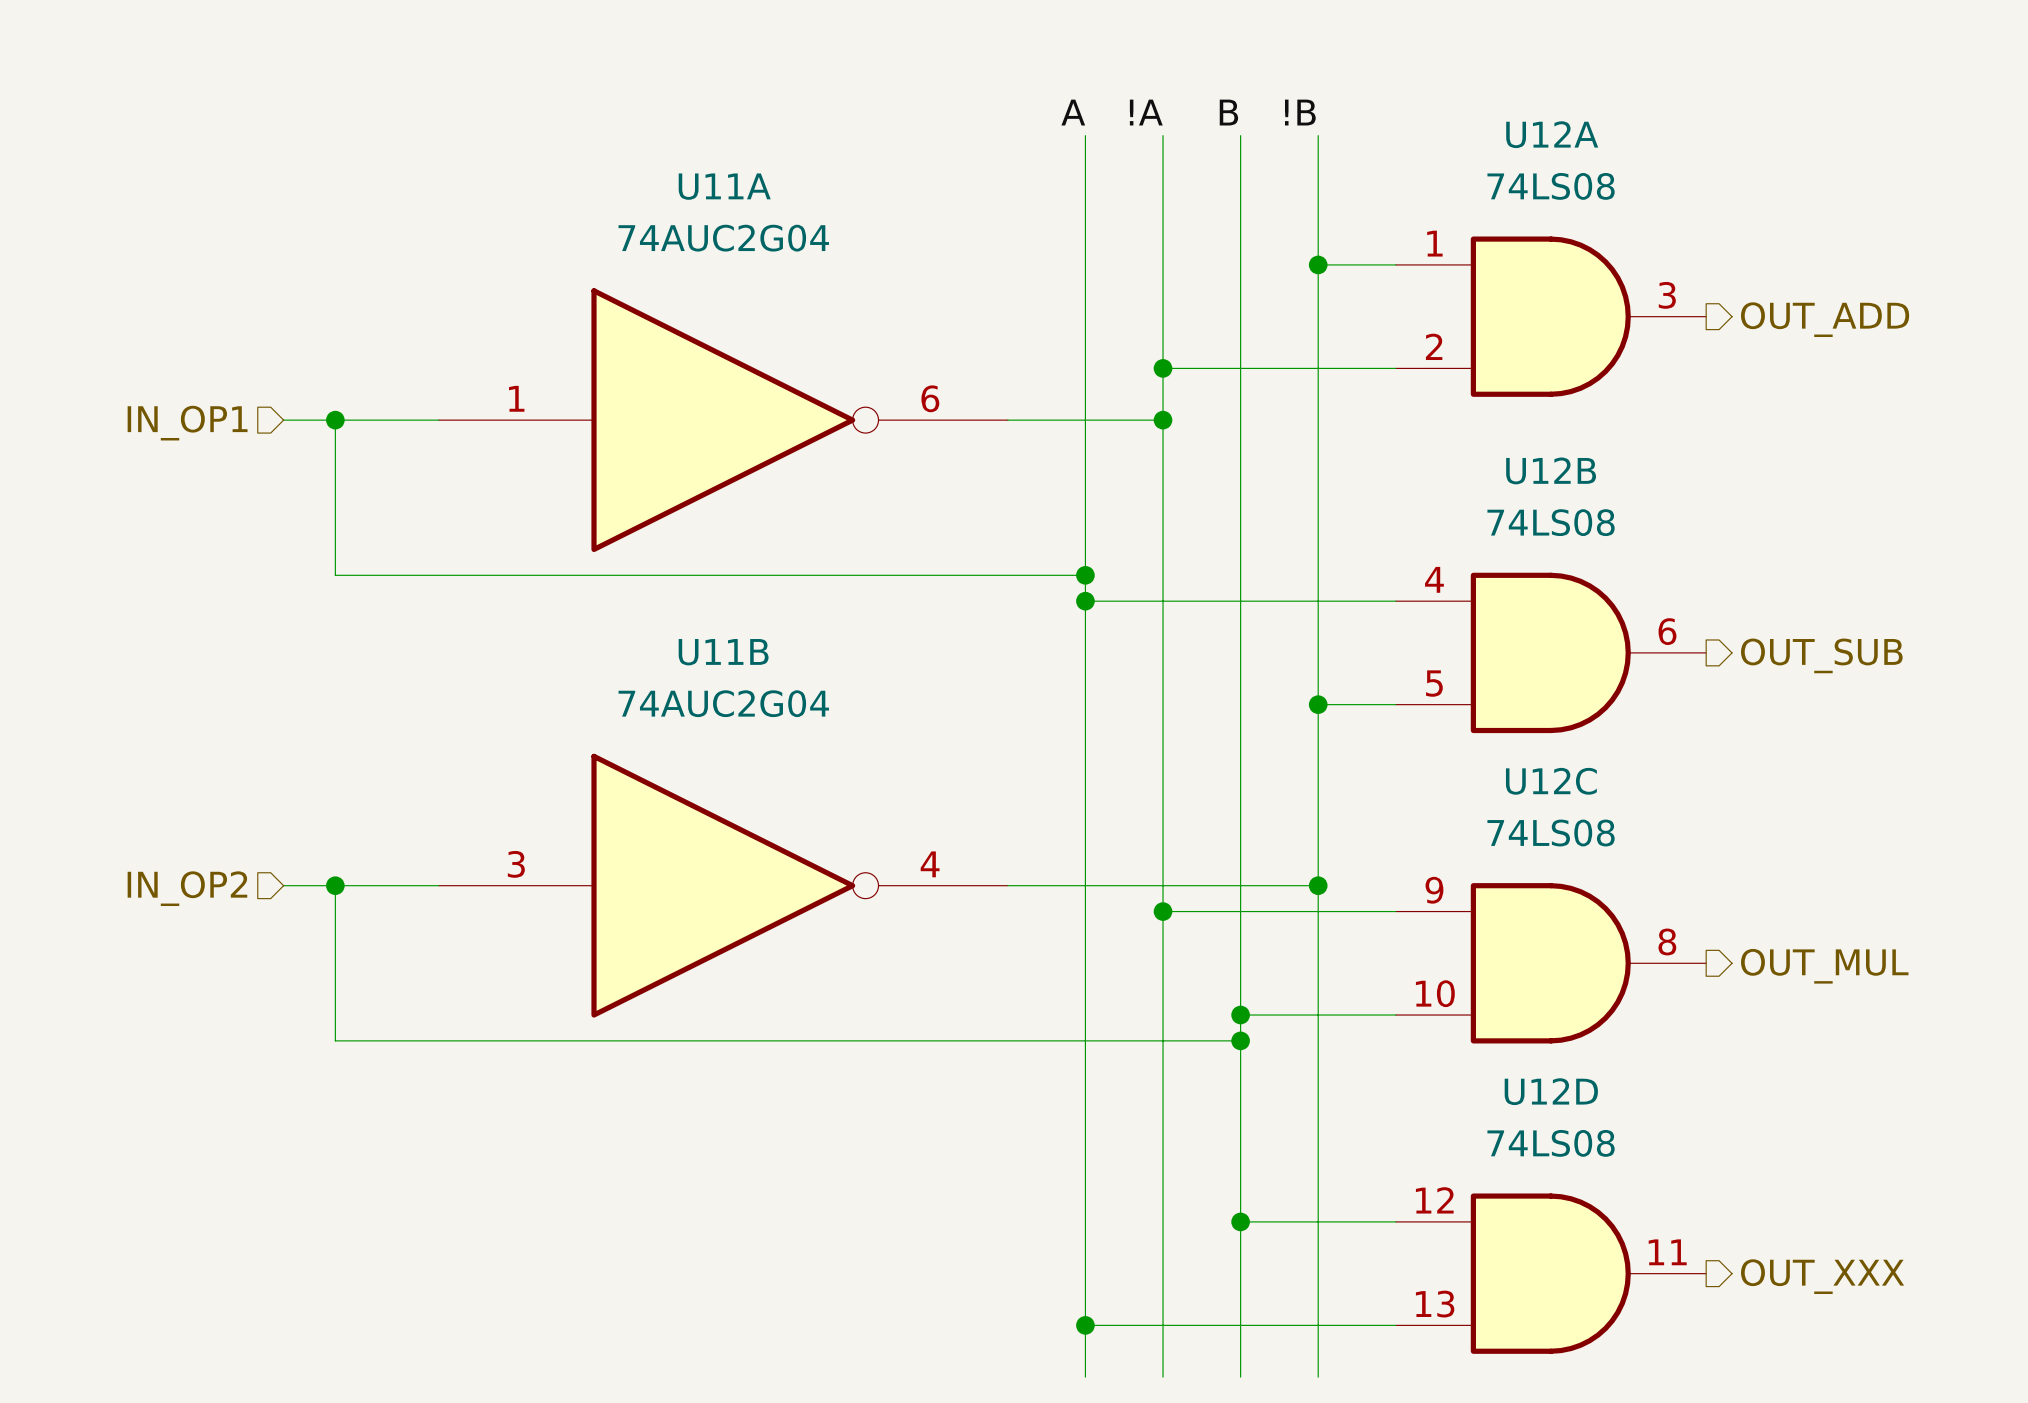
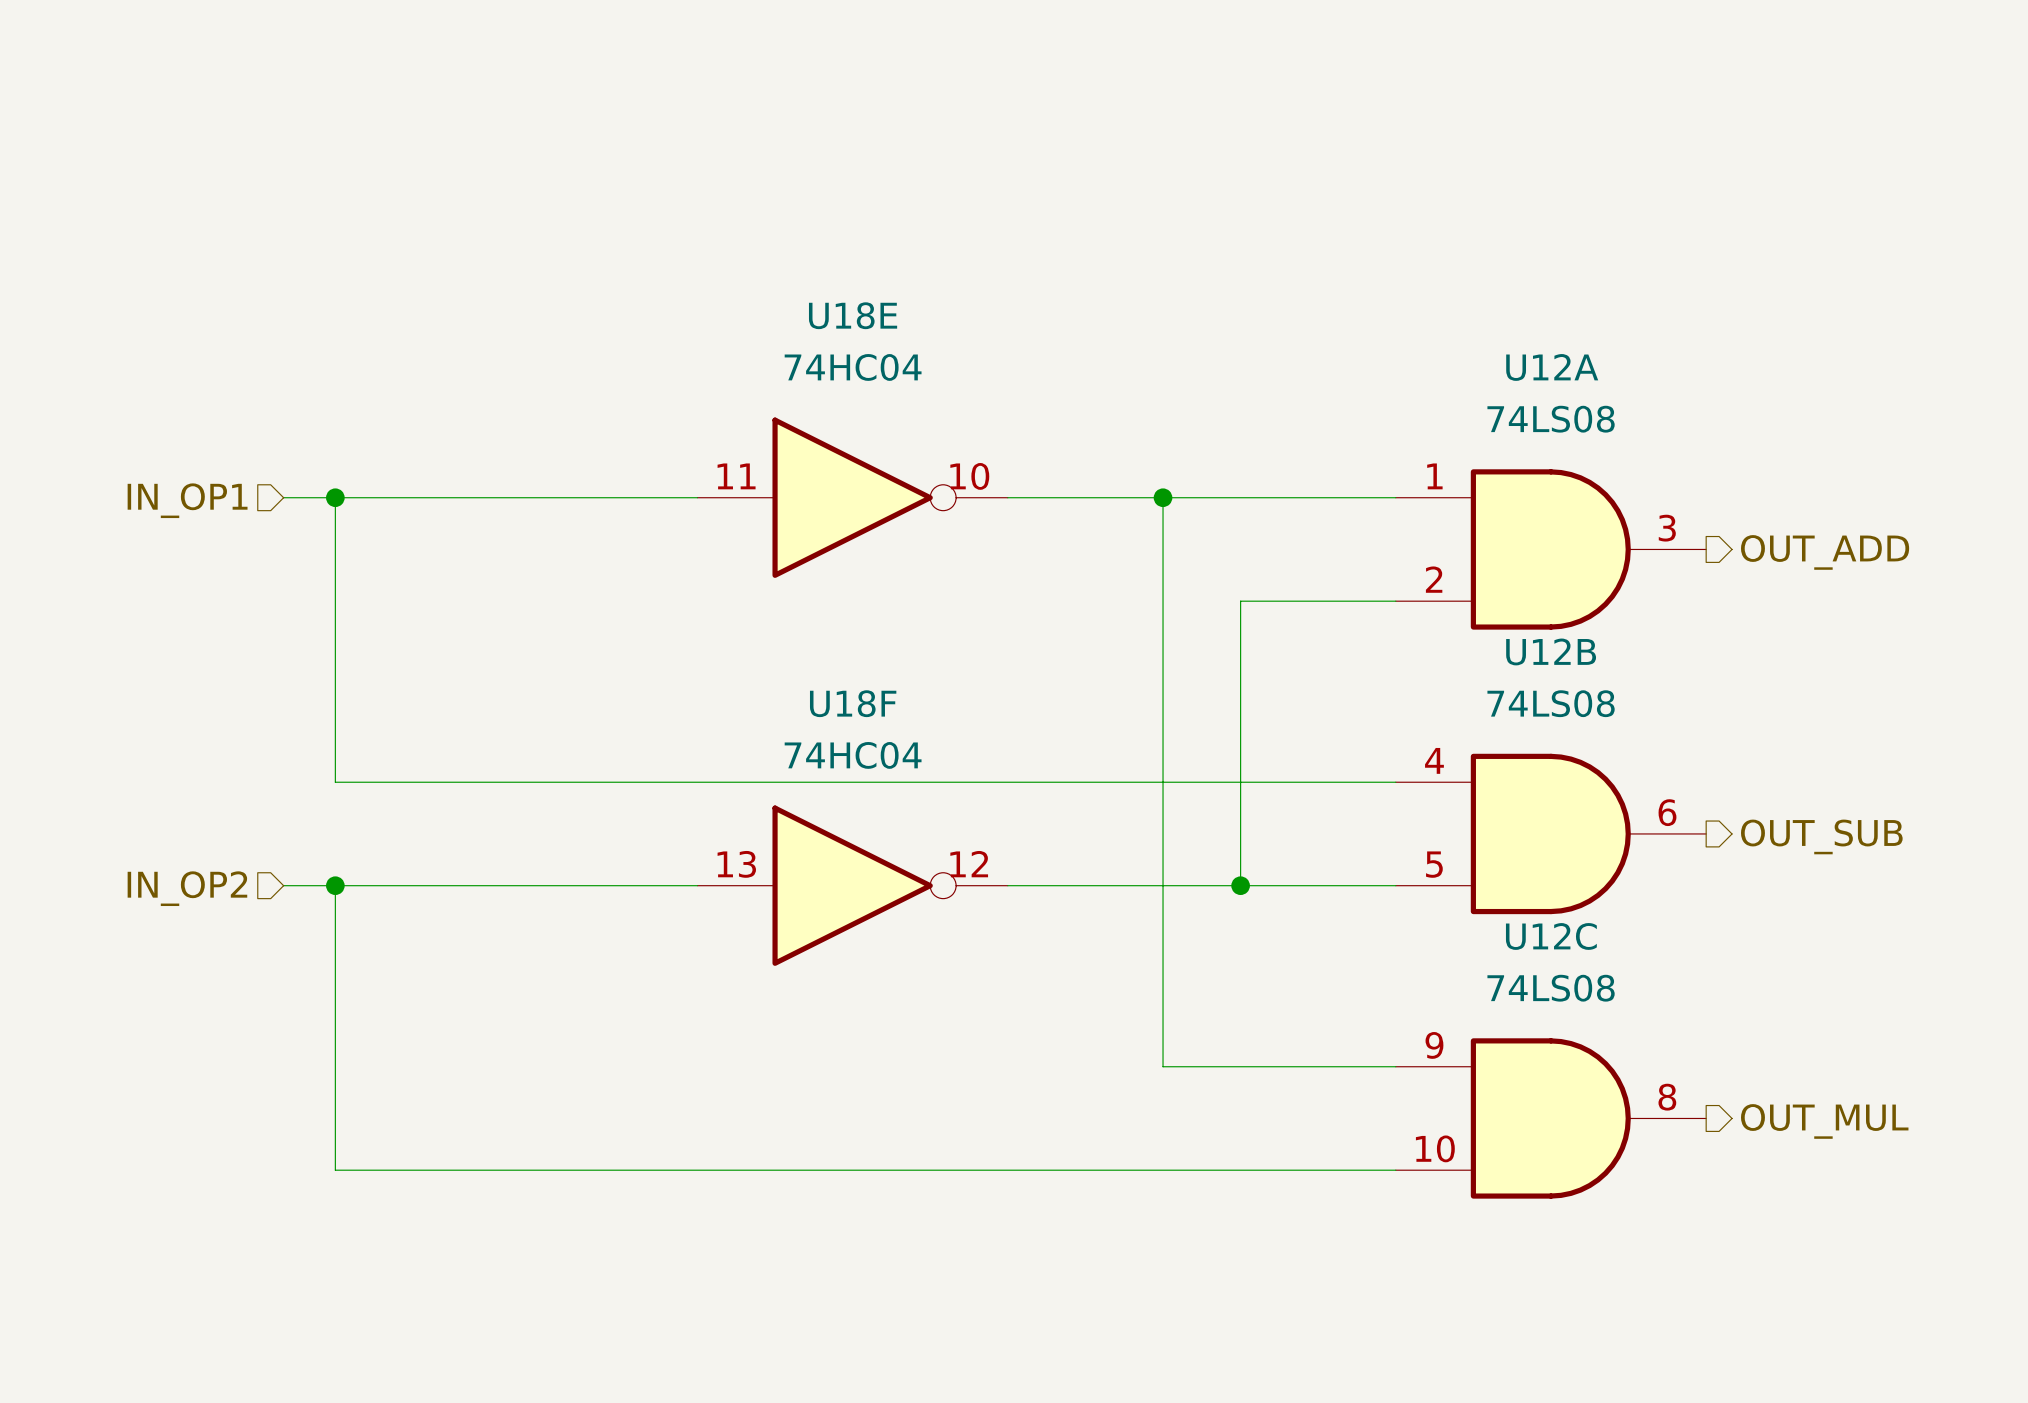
label: A (1073, 112) -> none
label: !A (1146, 112) -> none
label: B (1228, 112) -> none
label: !B (1300, 112) -> none
wire: (1085, 135) (1085, 1377) -> none
wire: (1163, 135) (1163, 497) -> none
wire: (1240, 135) (1240, 601) (1085, 601) -> none
wire: (1318, 135) (1318, 1377) -> none
wire: (1318, 264) (1395, 264) -> none
junction: (1318, 264) -> none
U12A position: (1550, 316) -> (1550, 549)
hierarchical label position: OUT_ADD (1825, 319) -> OUT_ADD (1825, 552)
wire: (1163, 368) (1395, 368) -> none
junction: (1163, 368) -> none
wire: (283, 420) (438, 420) -> none
wire: (335, 420) (335, 497) -> none
junction position: (335, 420) -> (335, 497)
U11A: 74AUC2G04 (723, 420) -> none
wire: (1007, 420) (1163, 420) -> none
junction: (1163, 420) -> none
hierarchical label position: IN_OP1 (187, 423) -> IN_OP1 (187, 500)
wire: none -> (283, 497) (697, 497)
U18E: none -> 74HC04 (852, 497)
wire: none -> (1007, 497) (1395, 497)
junction: none -> (1163, 497)
wire: (335, 575) (1085, 575) -> (335, 575) (335, 782) (1395, 782)
junction: (1085, 575) -> none
junction: (1085, 601) -> none
U12B position: (1550, 652) -> (1550, 833)
hierarchical label position: OUT_SUB (1821, 655) -> OUT_SUB (1821, 836)
wire: (1318, 704) (1395, 704) -> (1318, 885) (1395, 885)
junction: (1318, 704) -> none
U11B: 74AUC2G04 (723, 885) -> none
U18F: none -> 74HC04 (852, 885)
wire: (1240, 885) (1240, 1377) -> none
junction: none -> (1240, 885)
junction: (1318, 885) -> none
wire: (1163, 911) (1395, 911) -> none
junction: (1163, 911) -> none
U12C position: (1550, 963) -> (1550, 1118)
hierarchical label position: OUT_MUL (1824, 966) -> OUT_MUL (1824, 1121)
wire: (1240, 1015) (1395, 1015) -> none
junction: (1240, 1015) -> none
wire: (335, 1040) (1240, 1040) -> (335, 1040) (335, 1170) (1395, 1170)
junction: (1240, 1040) -> none
wire: (1163, 1066) (1163, 1377) -> (1163, 1066) (1395, 1066)
wire: (1240, 1221) (1395, 1221) -> none
junction: (1240, 1221) -> none
U12D: 74LS08 (1550, 1273) -> none
hierarchical label: OUT_XXX (1822, 1276) -> none
wire: (1085, 1325) (1395, 1325) -> none
junction: (1085, 1325) -> none

